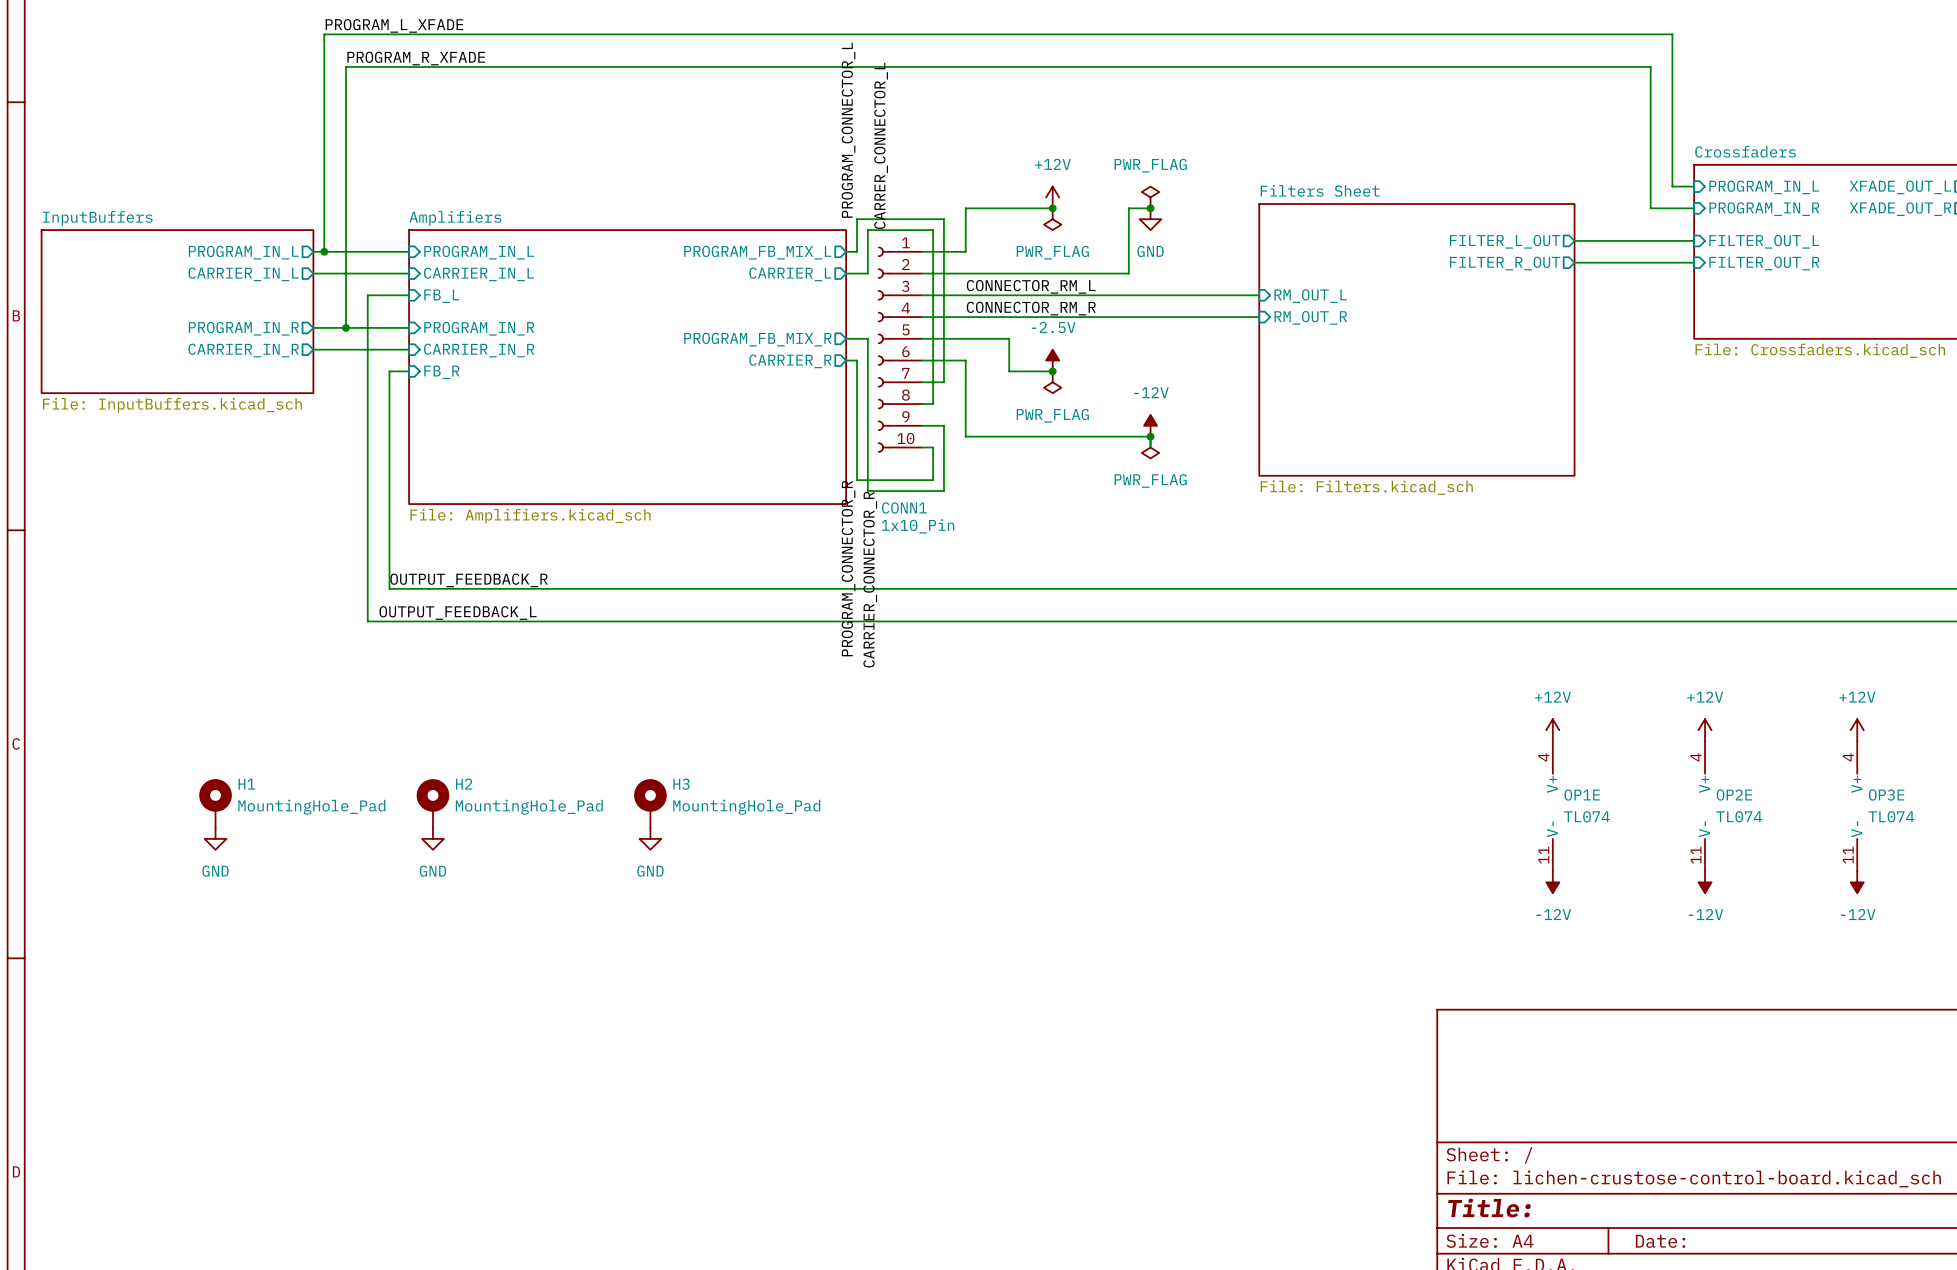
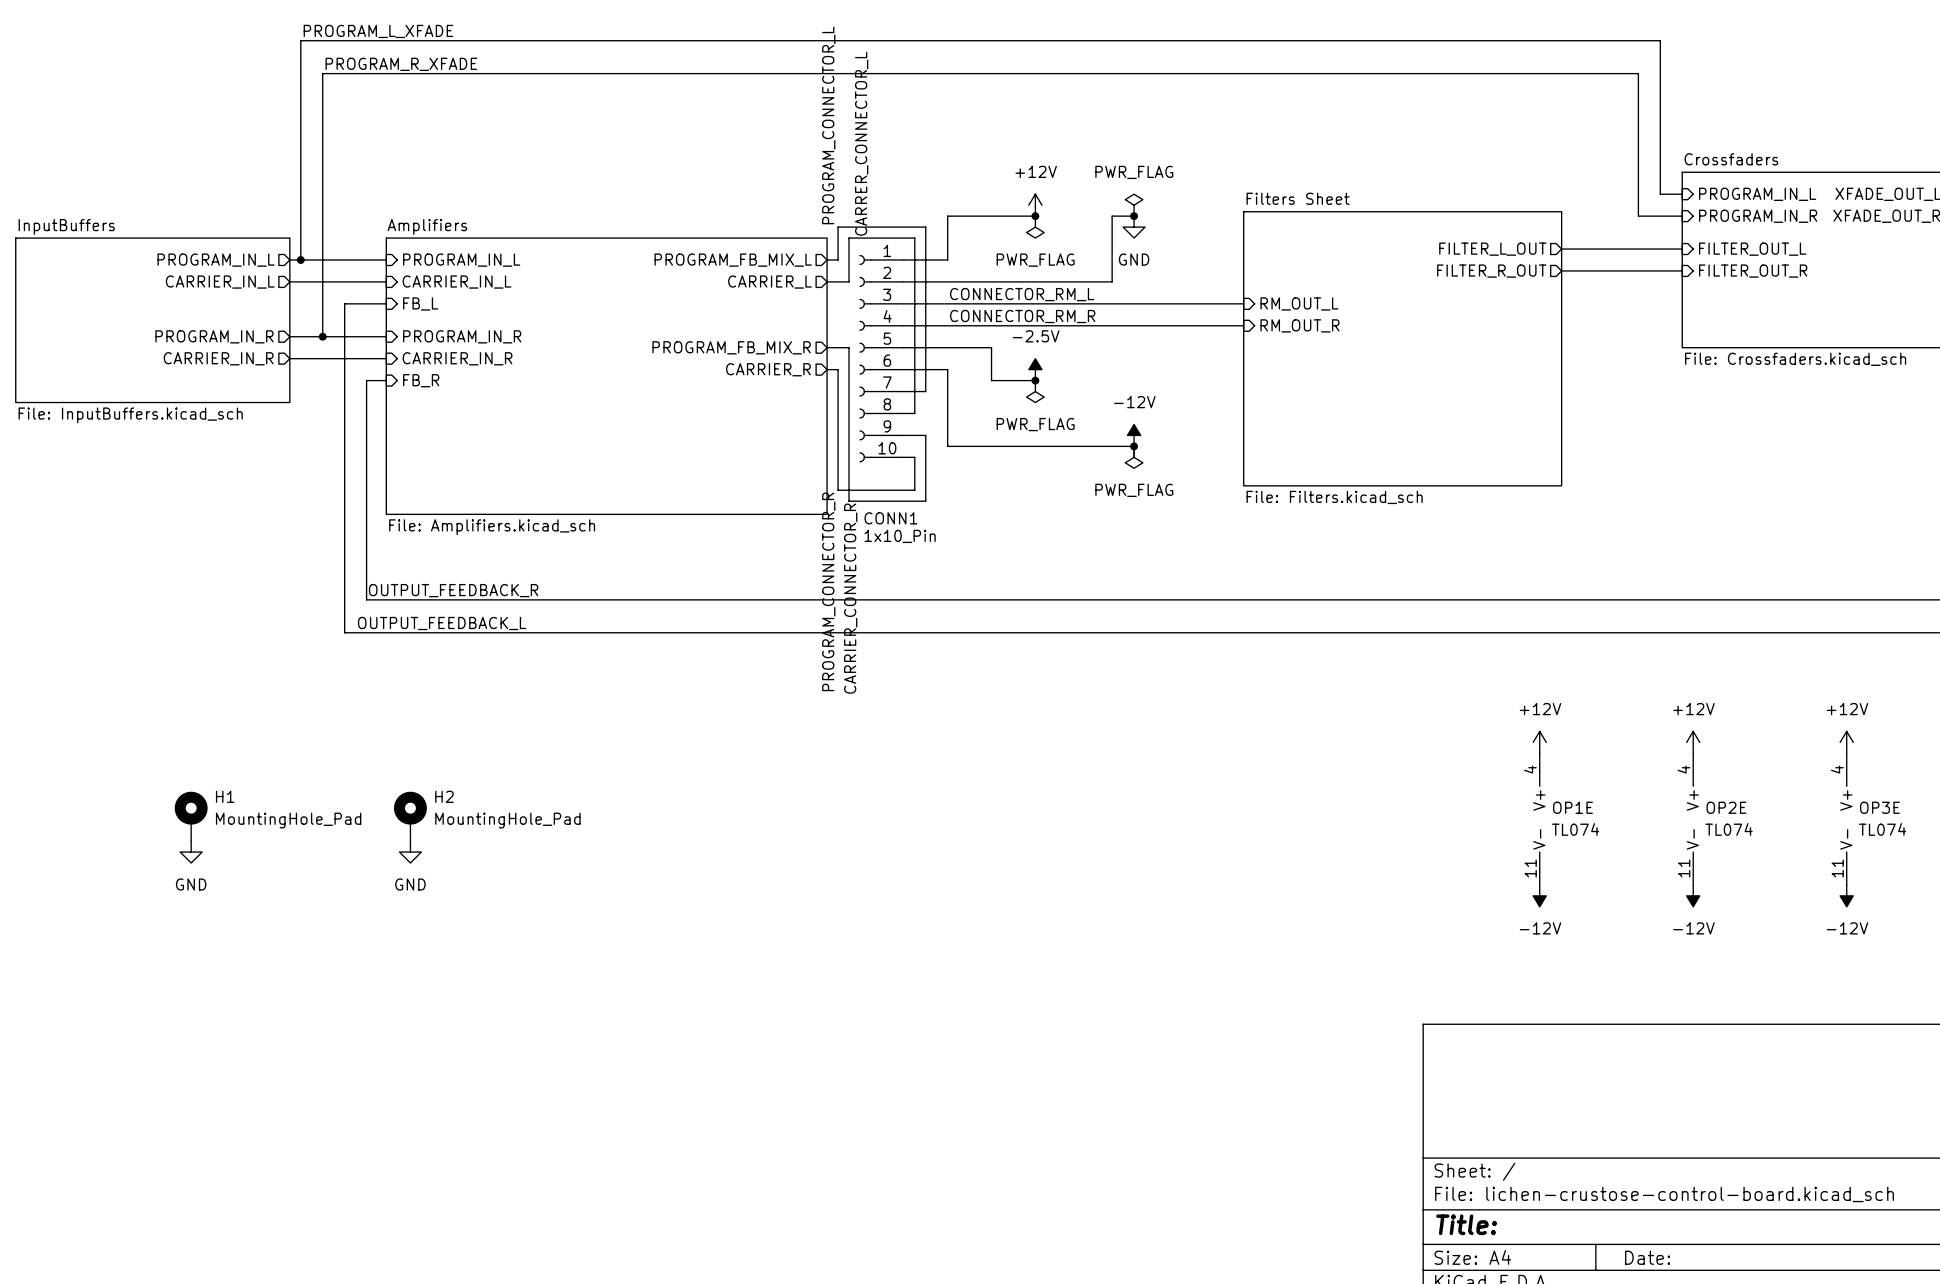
H3: MountingHole_Pad (650, 803) -> none
power symbol: GND (650, 838) -> none

